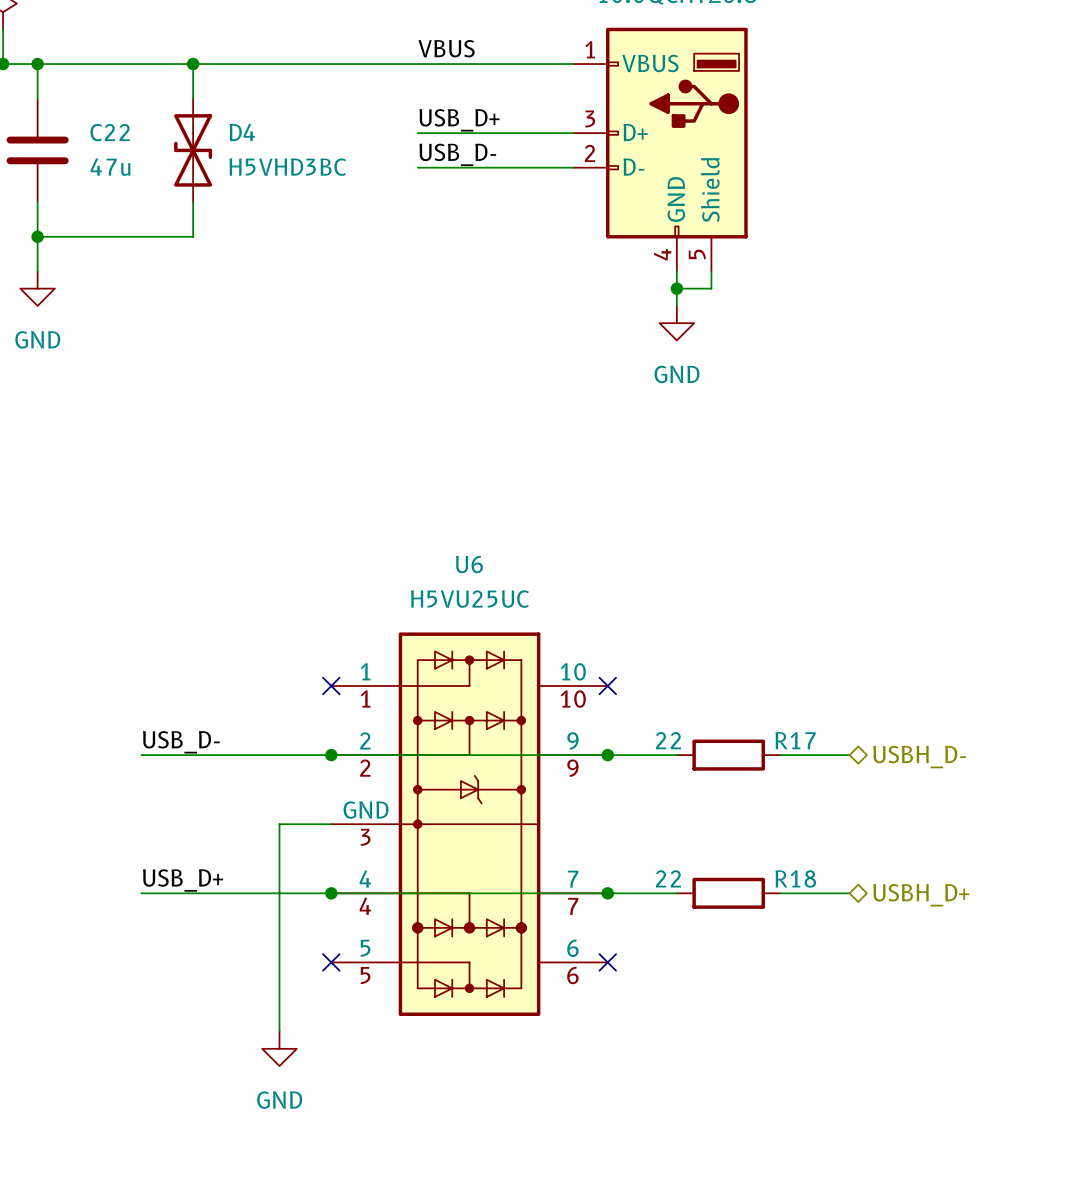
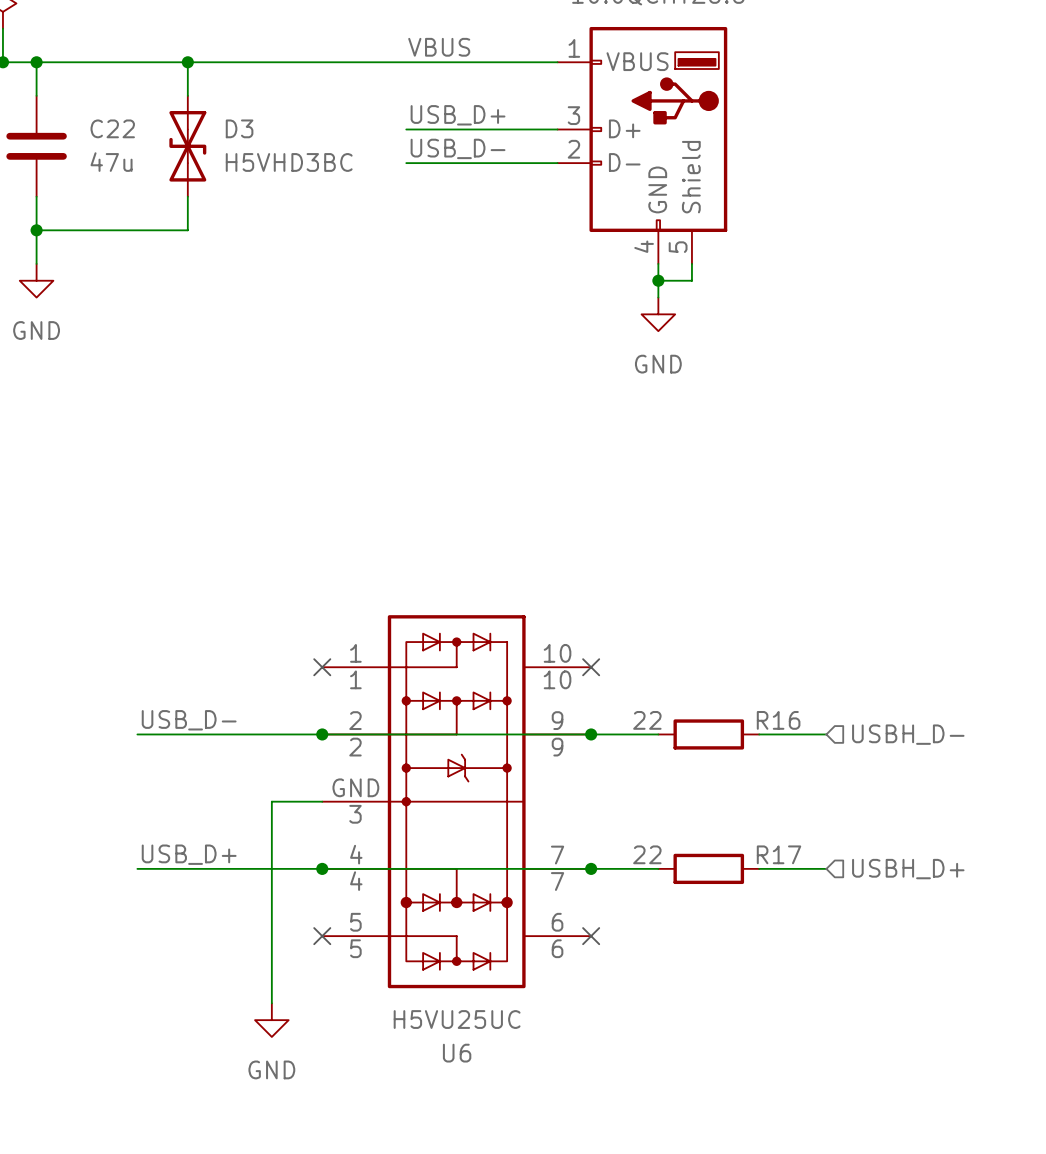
D4 name: D4 (242, 132) -> D3 (239, 128)
U6 name position: U6 (469, 564) -> U6 (457, 1053)
U6 value position: H5VU25UC (469, 599) -> H5VU25UC (457, 1019)
R17 name: R17 (795, 740) -> R16 (778, 720)
hierarchical label shape: bidirectional (919, 757) -> input (908, 734)
R18 name: R18 (795, 878) -> R17 (779, 854)
hierarchical label shape: bidirectional (921, 895) -> input (908, 869)

